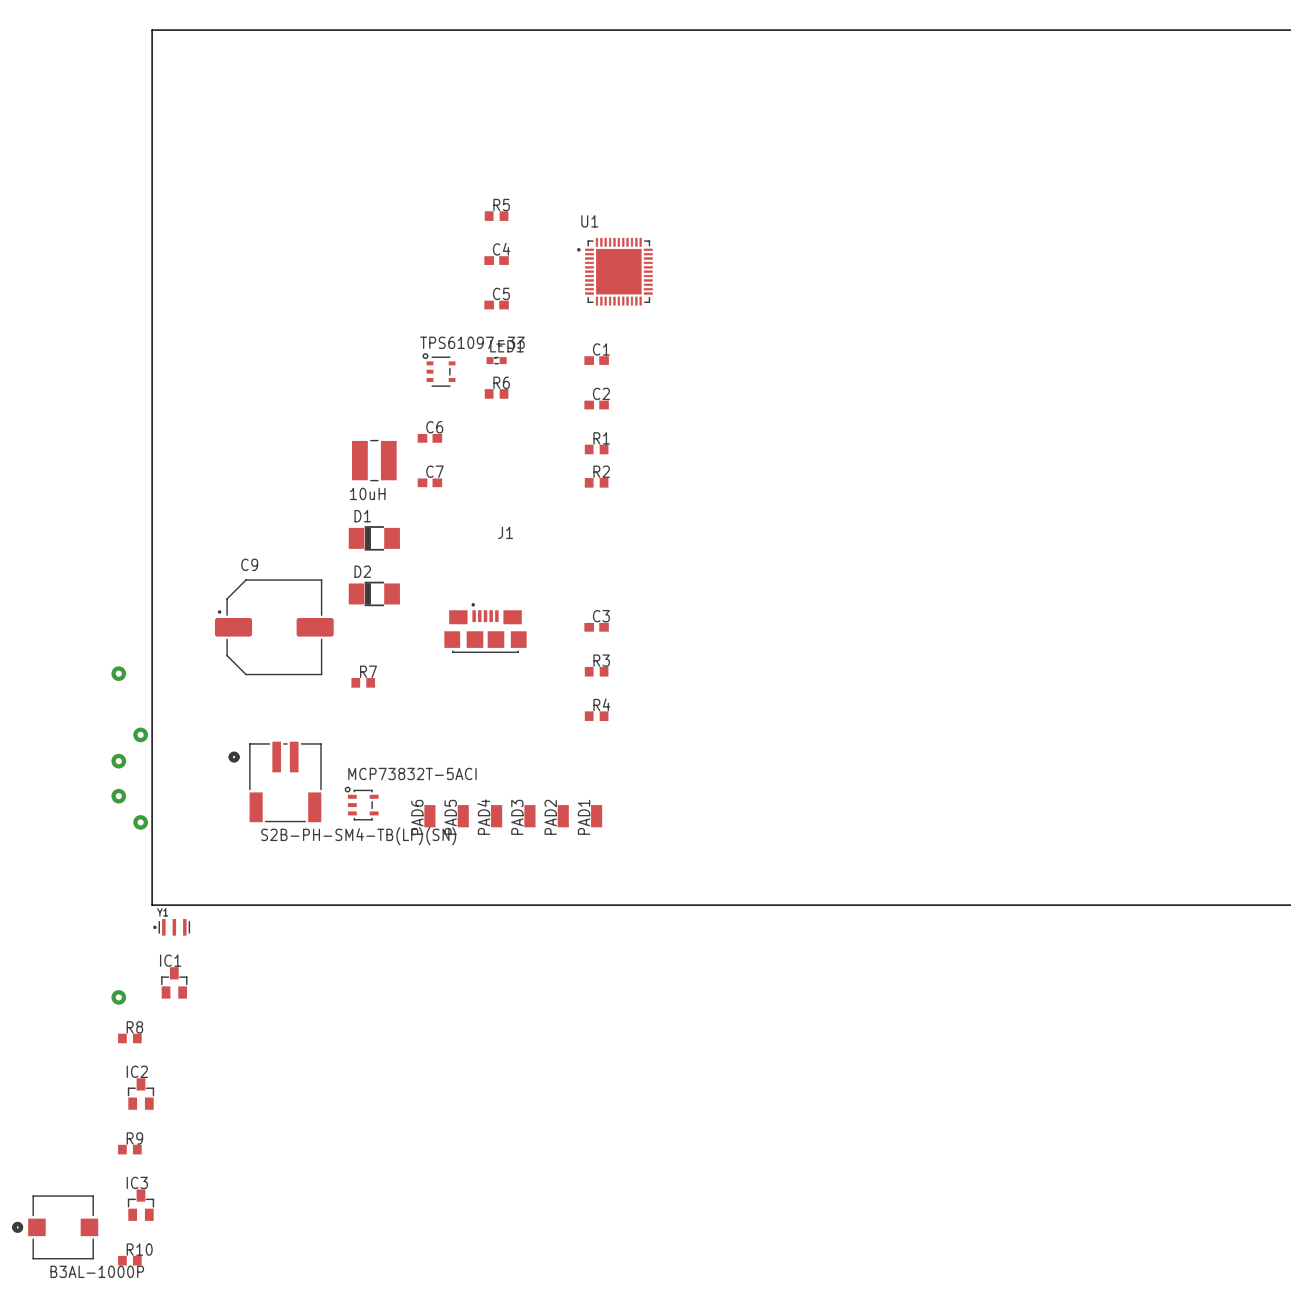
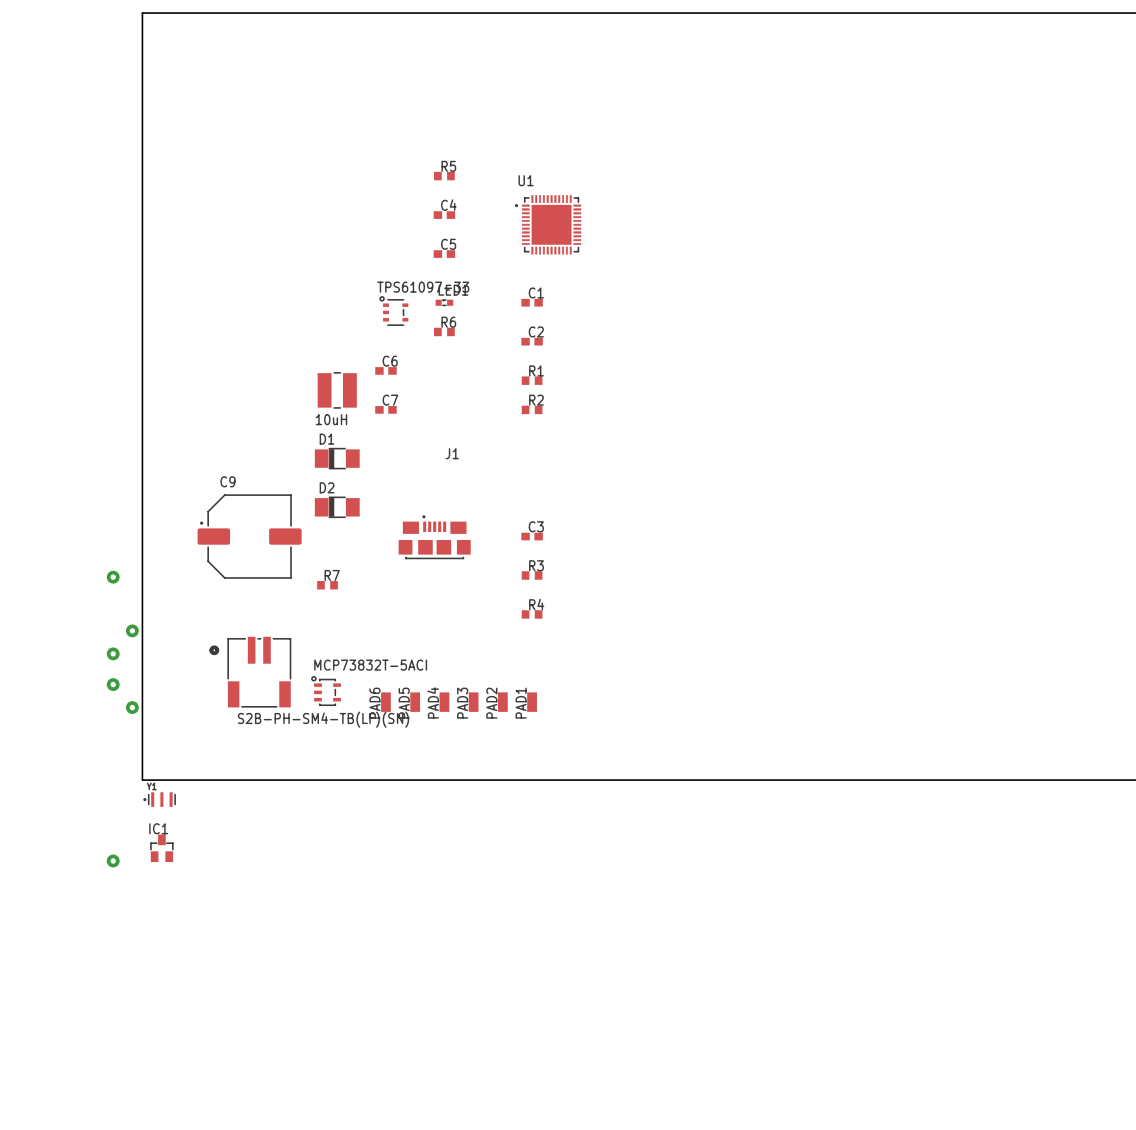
R8: (129, 1038) -> none
IC2: (140, 1094) -> none
R9: (129, 1149) -> none
IC3: (140, 1205) -> none
part: B3AL-1000P (55, 1227) -> none
R10: (129, 1260) -> none

